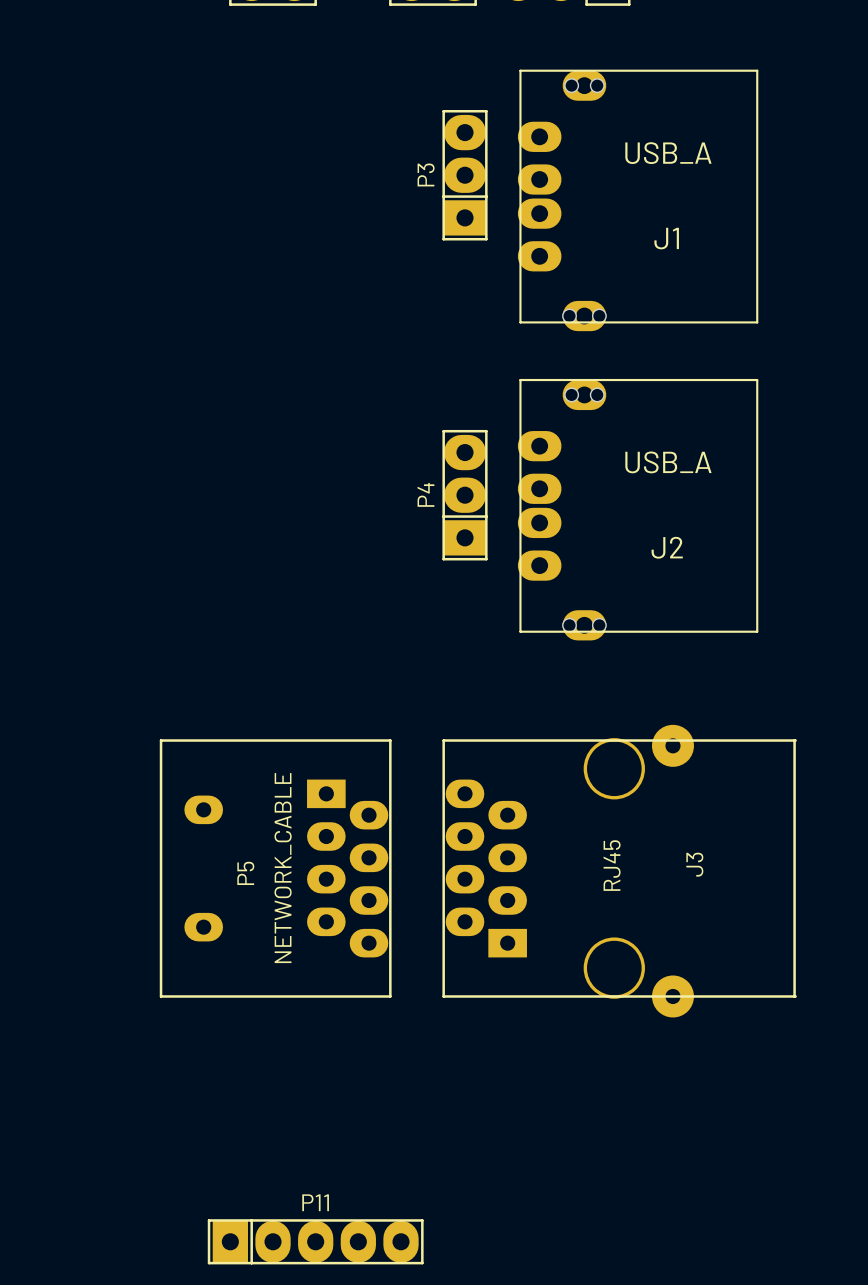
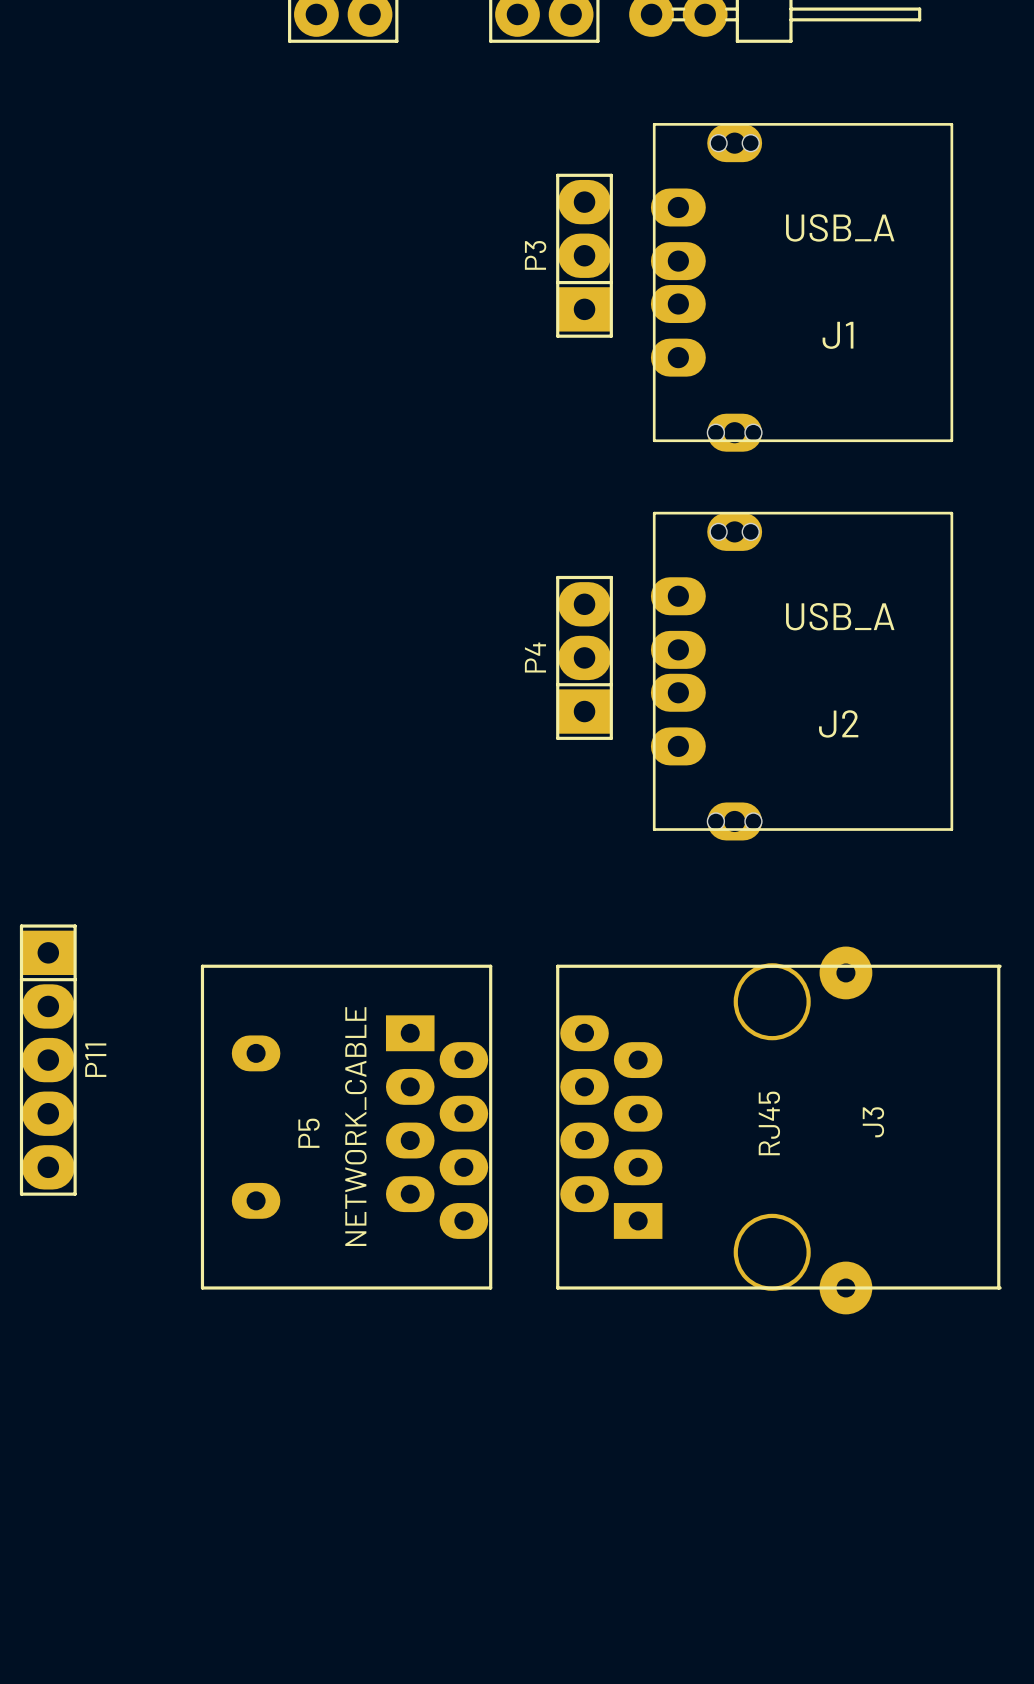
P11 rotation: 0° (315, 1241) -> 90° clockwise (48, 1060)
P11 position: (315, 1241) -> (48, 1060)

